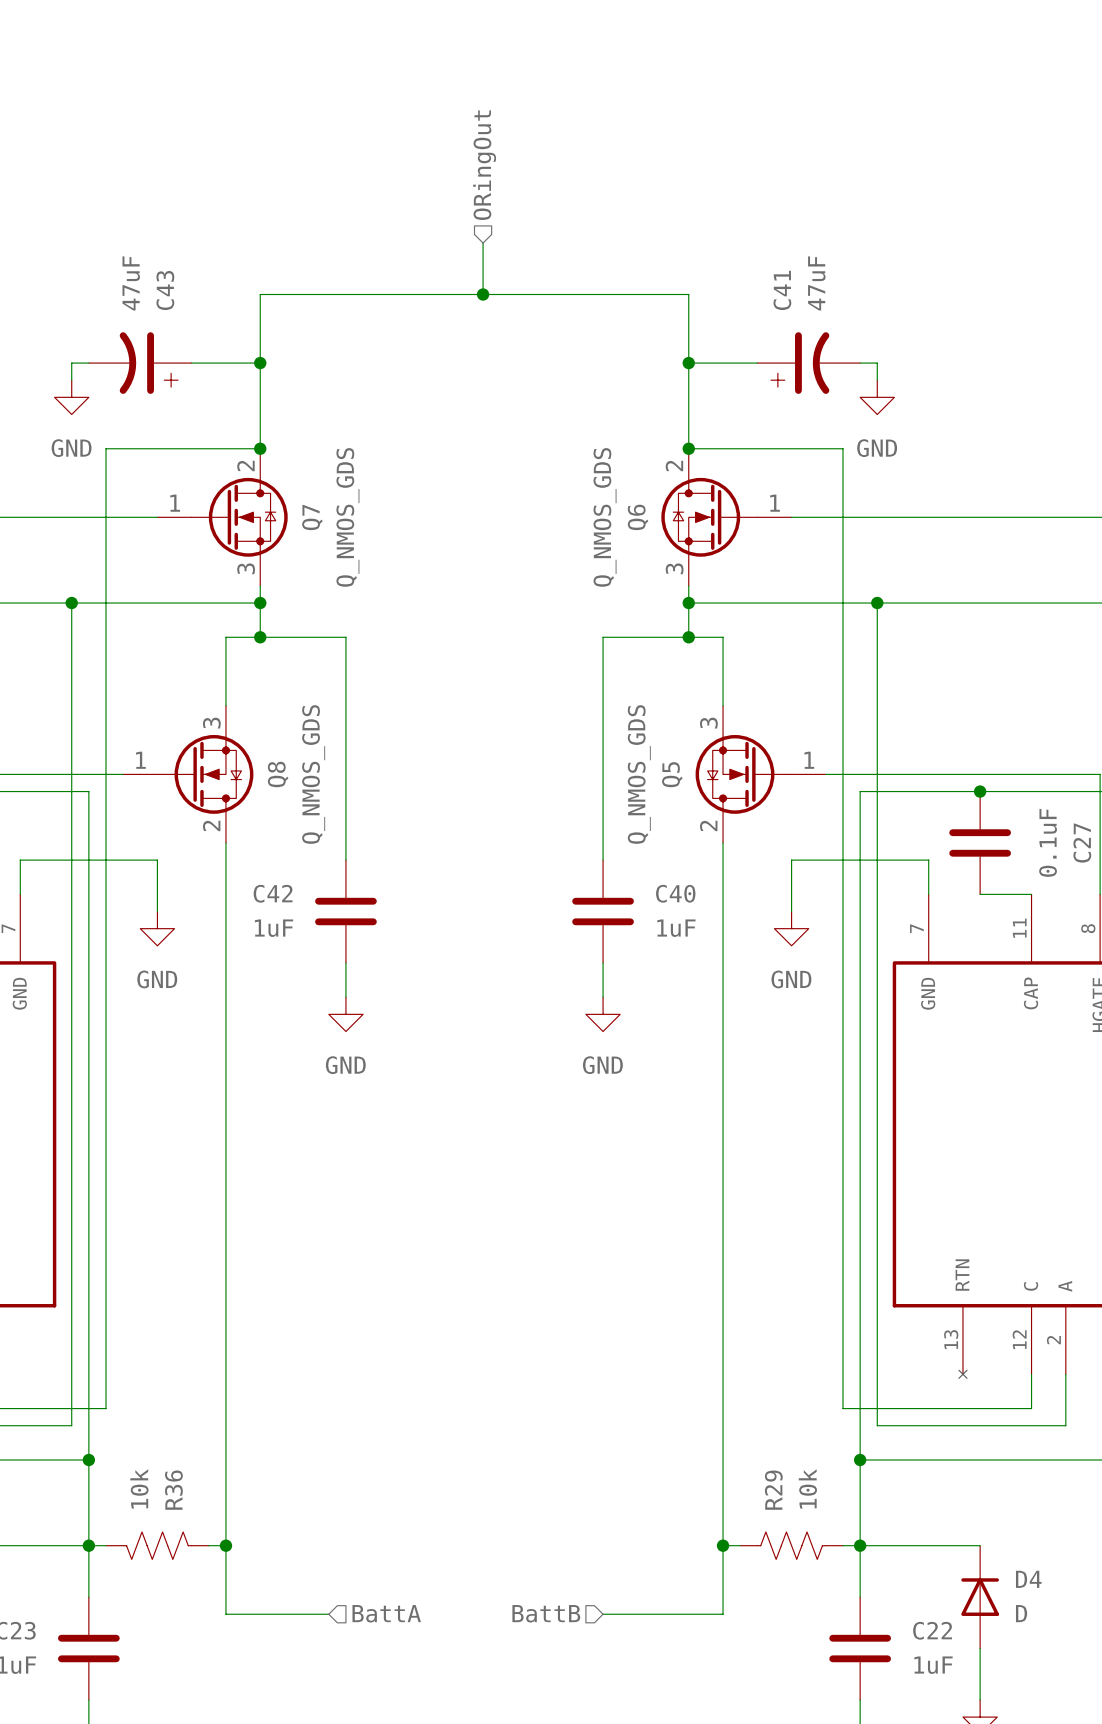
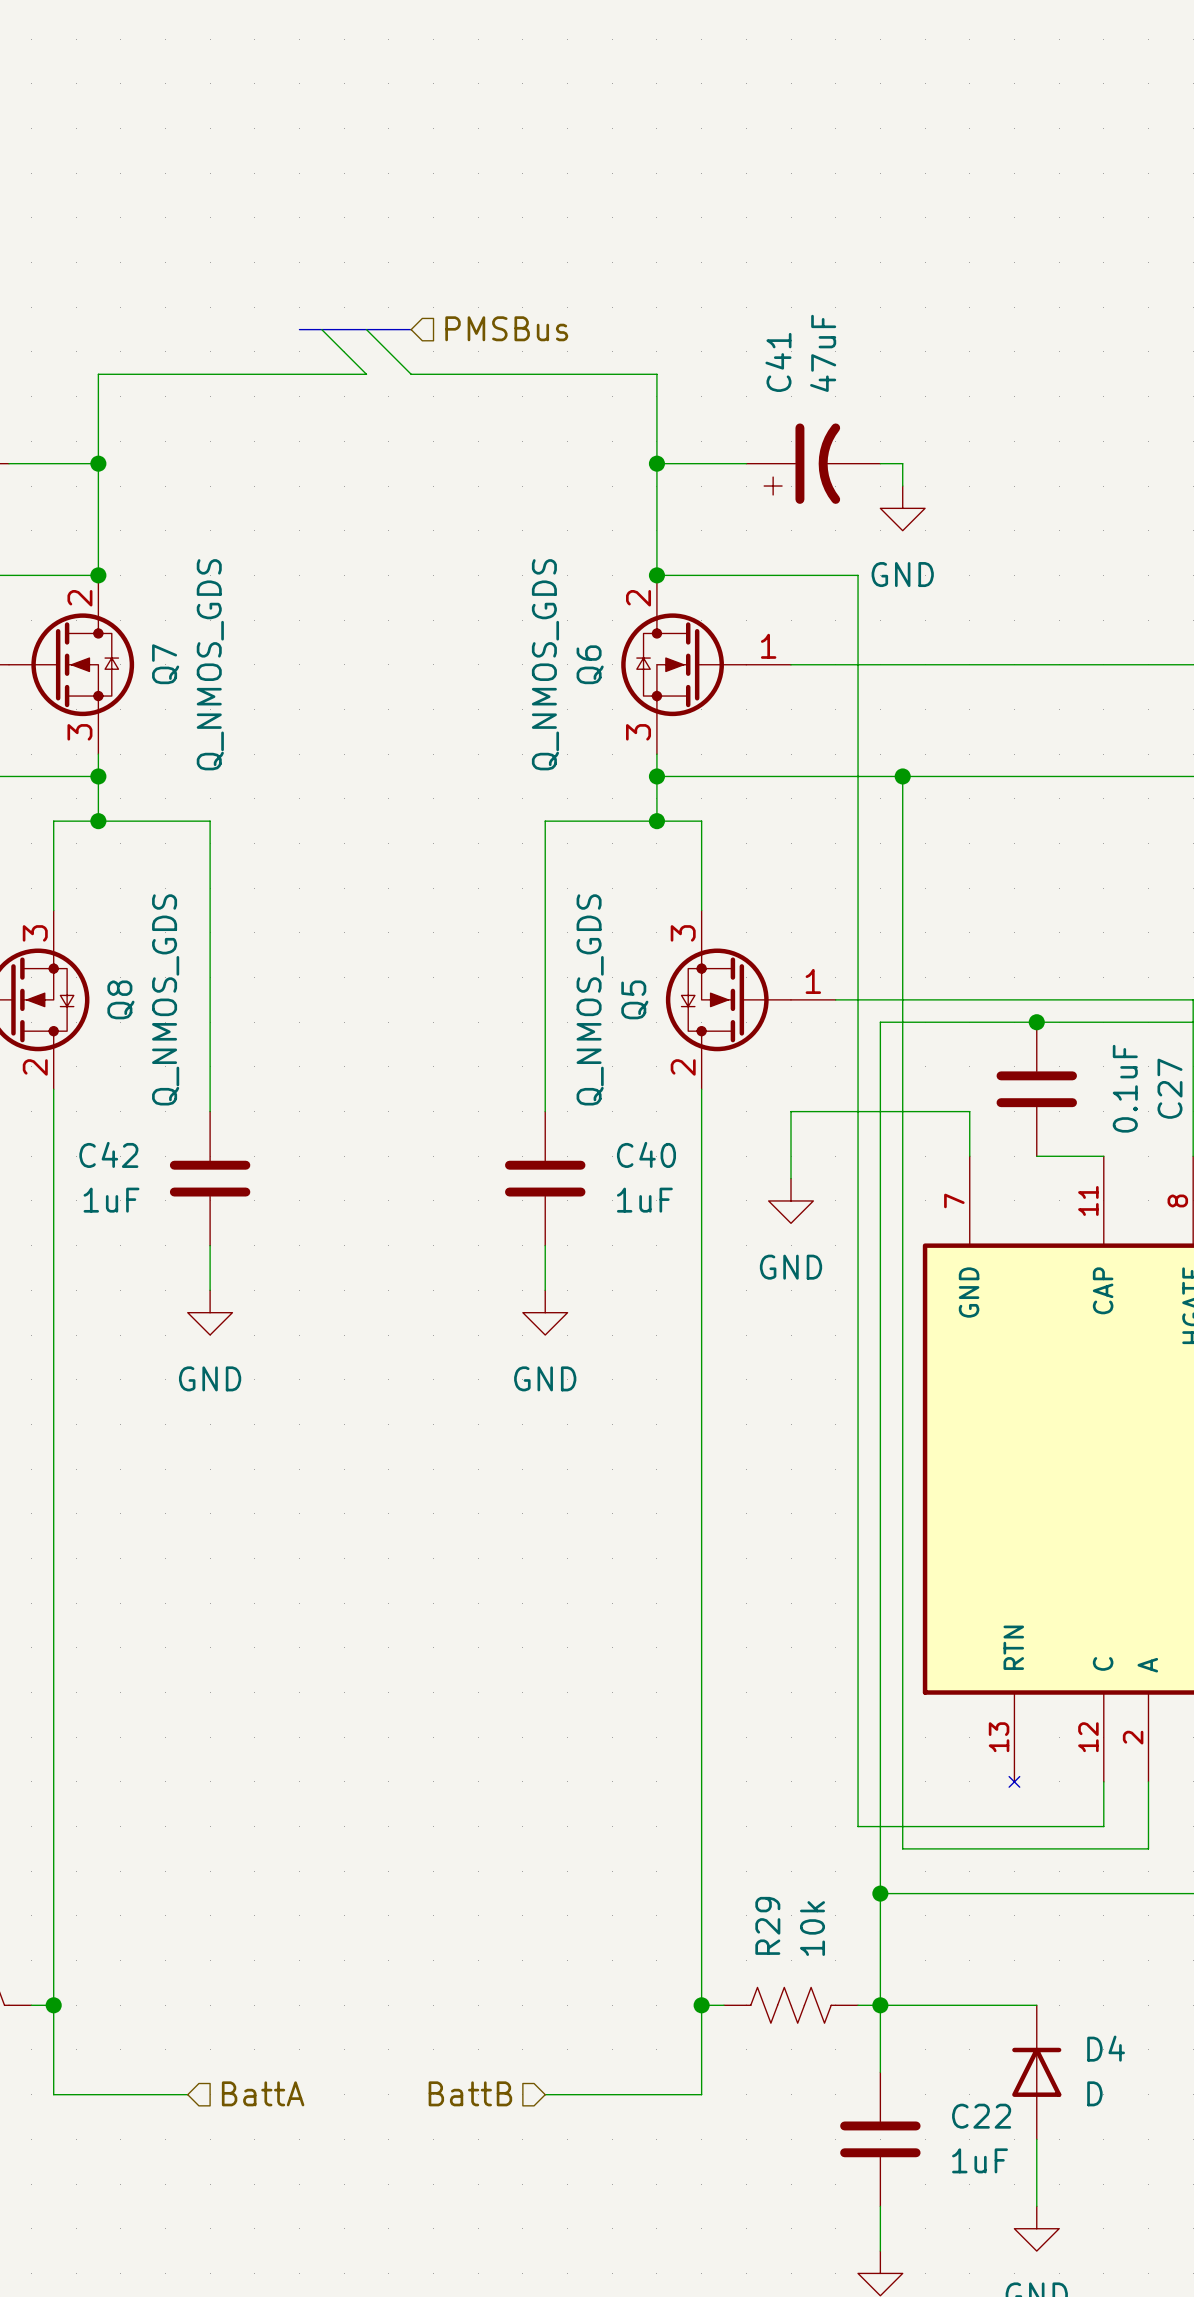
hierarchical label: ORingOut (484, 165) -> none
wire: (483, 243) (483, 294) -> none
hierarchical label: none -> PMSBus (506, 328)
bus: none -> (299, 329) (411, 329)
wire: none -> (321, 329) (366, 374)
wire: (465, 294) (500, 294) -> (366, 329) (411, 374)
junction: (483, 294) -> none

